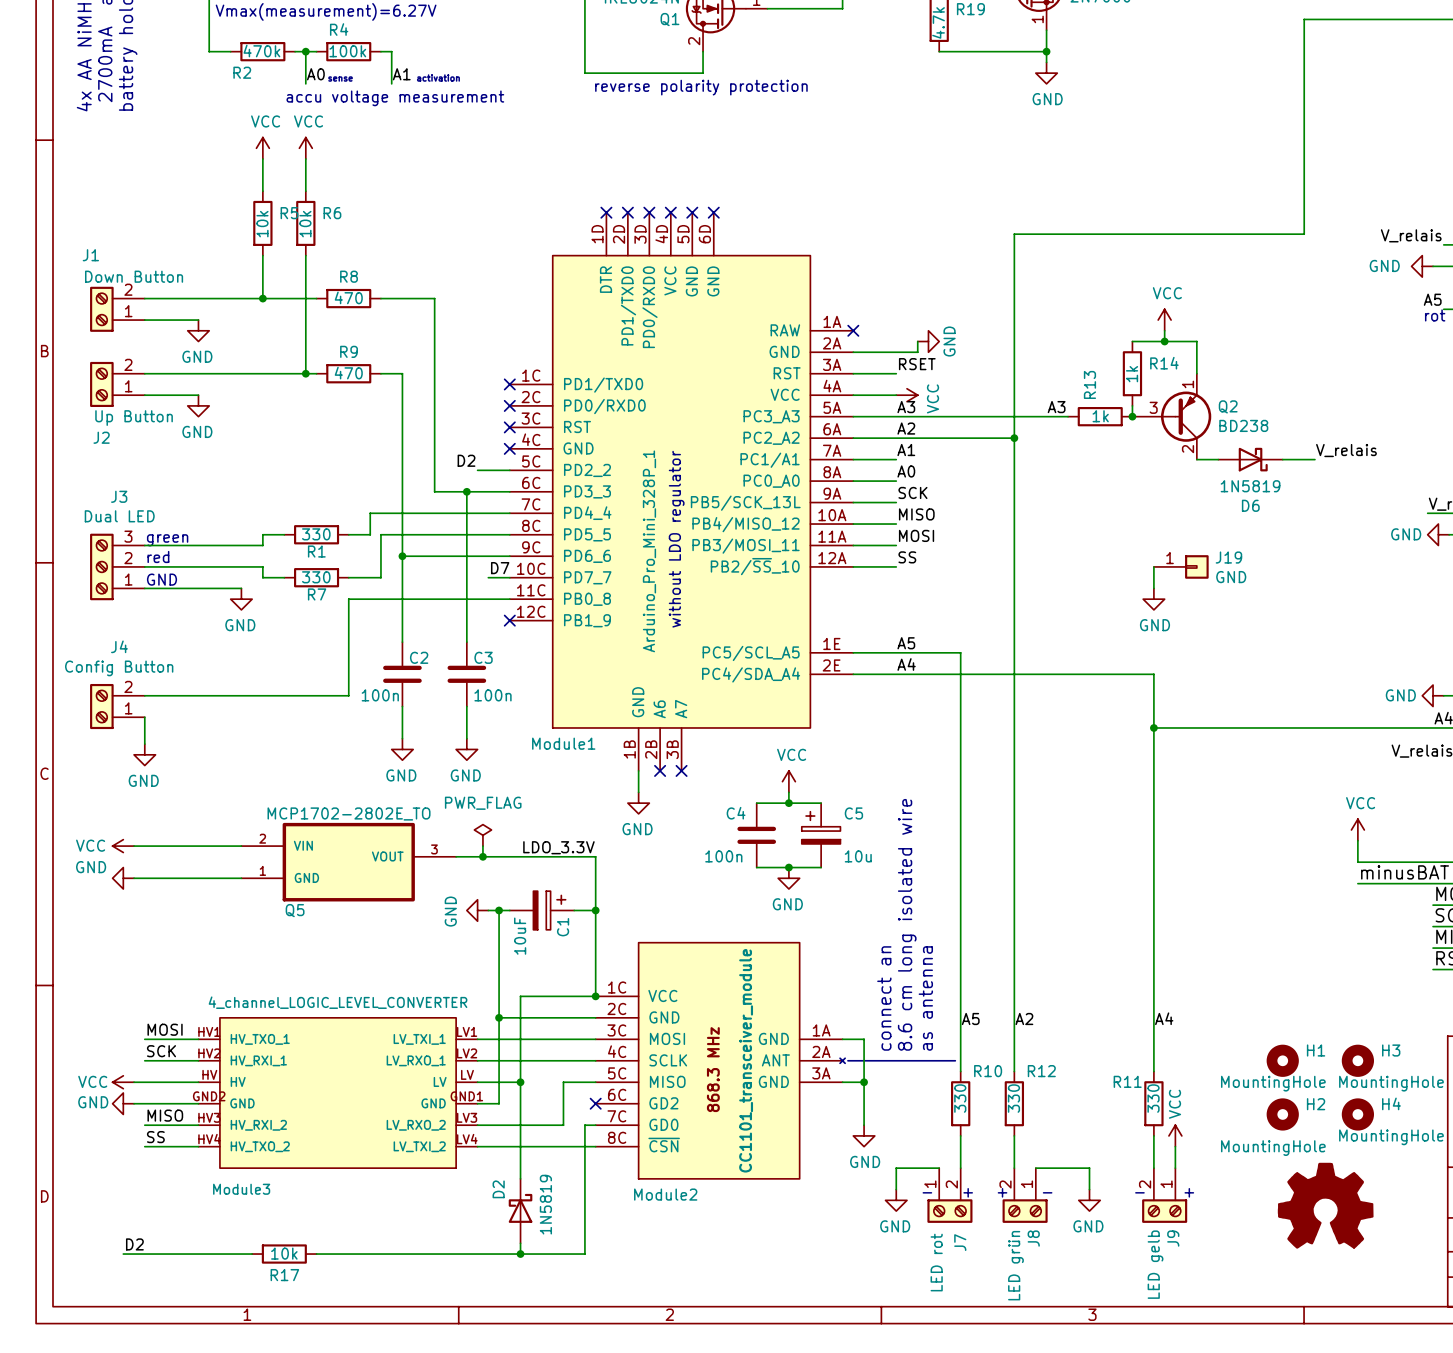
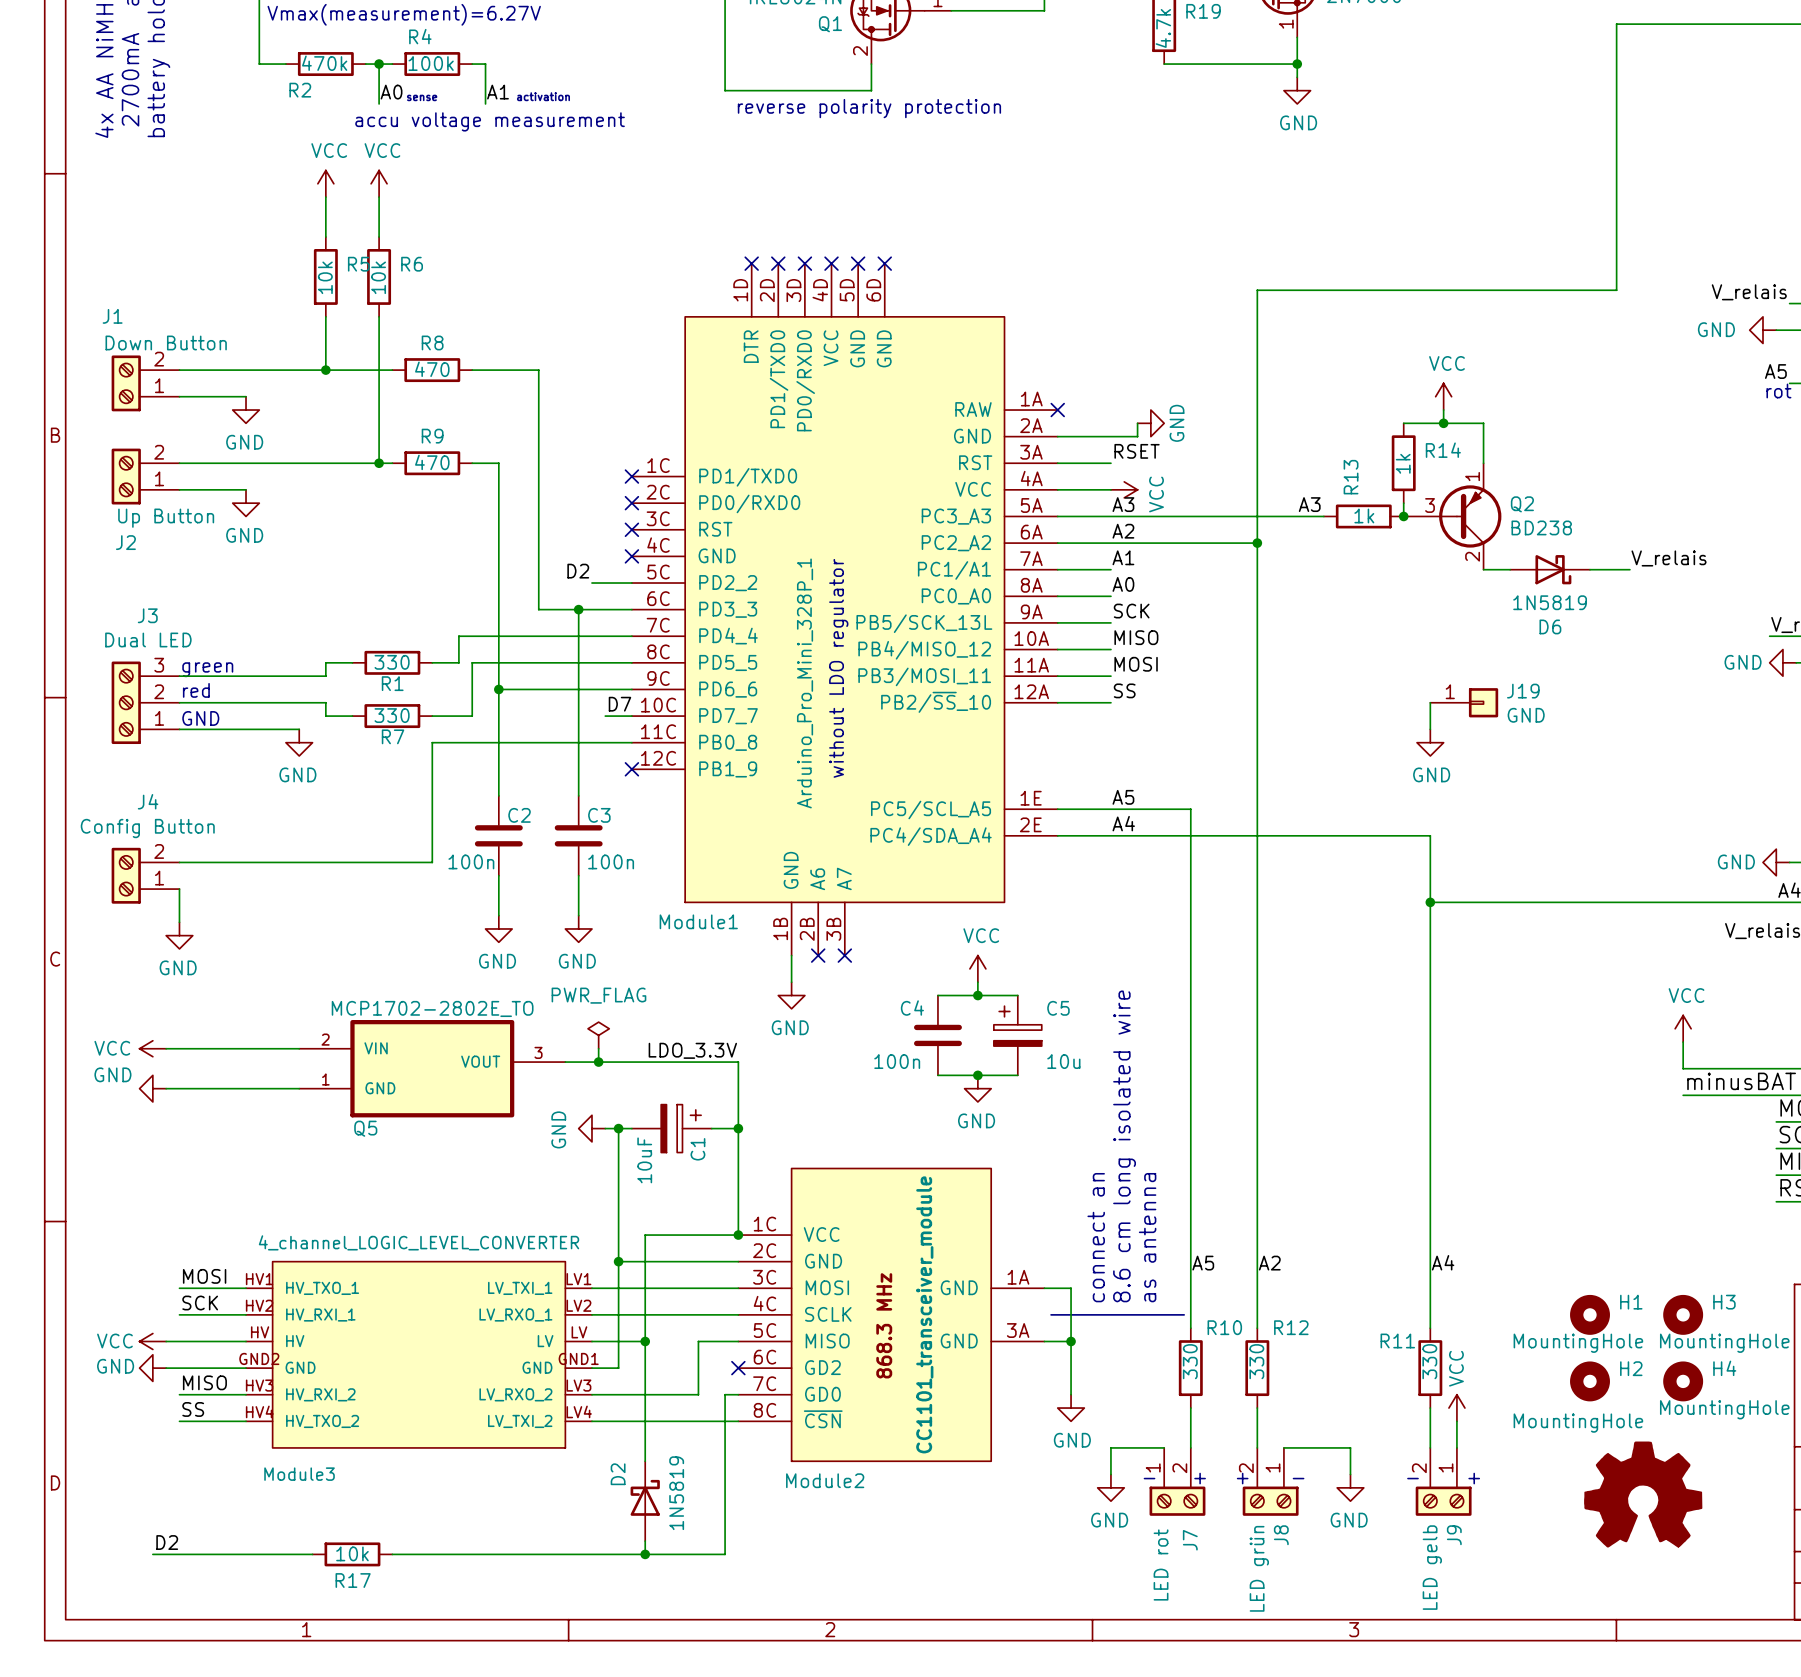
Module2 symbol: [595, 942, 846, 1179] -> [738, 1168, 1045, 1462]

